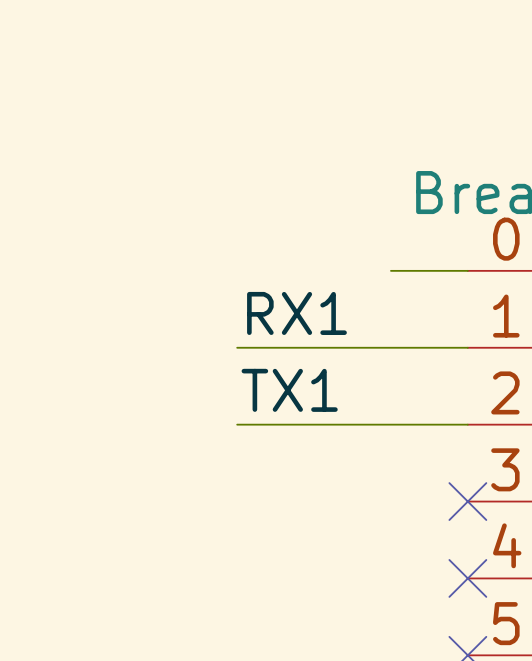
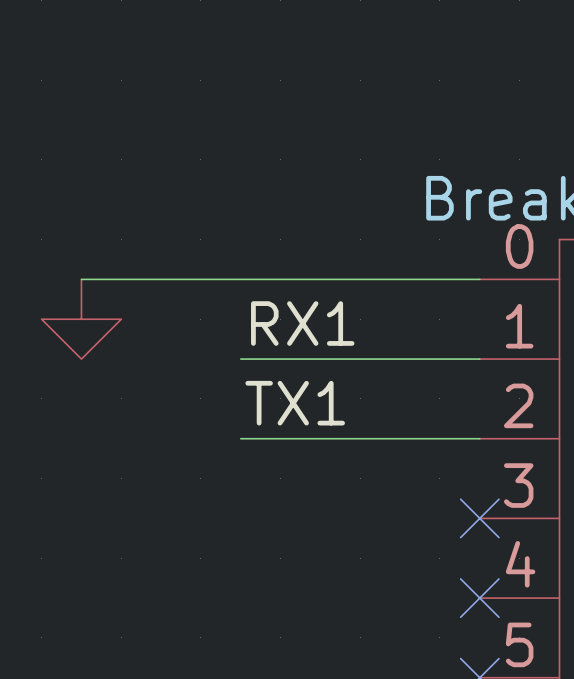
wire: none -> (81, 279) (400, 279)
power symbol: none -> (81, 319)

